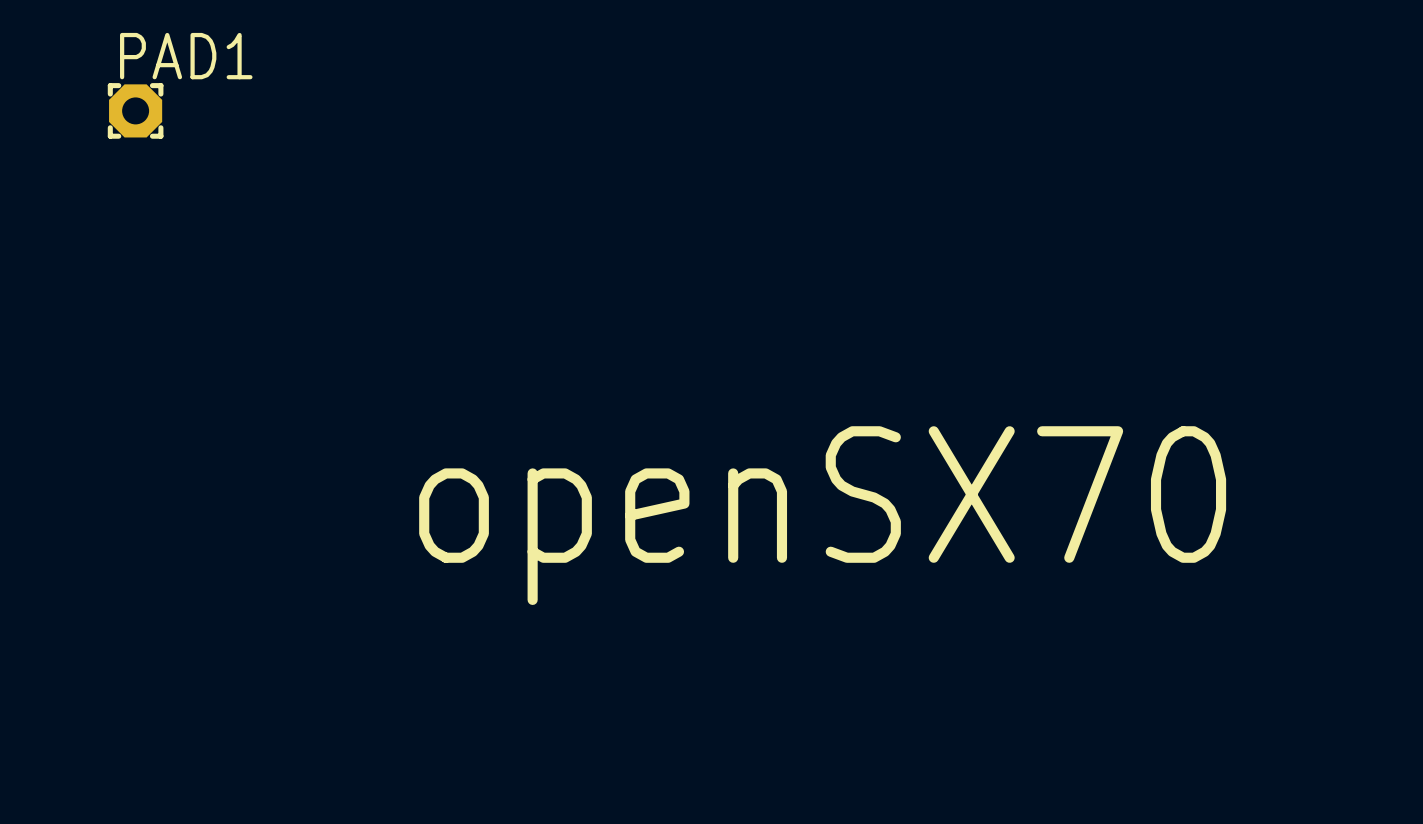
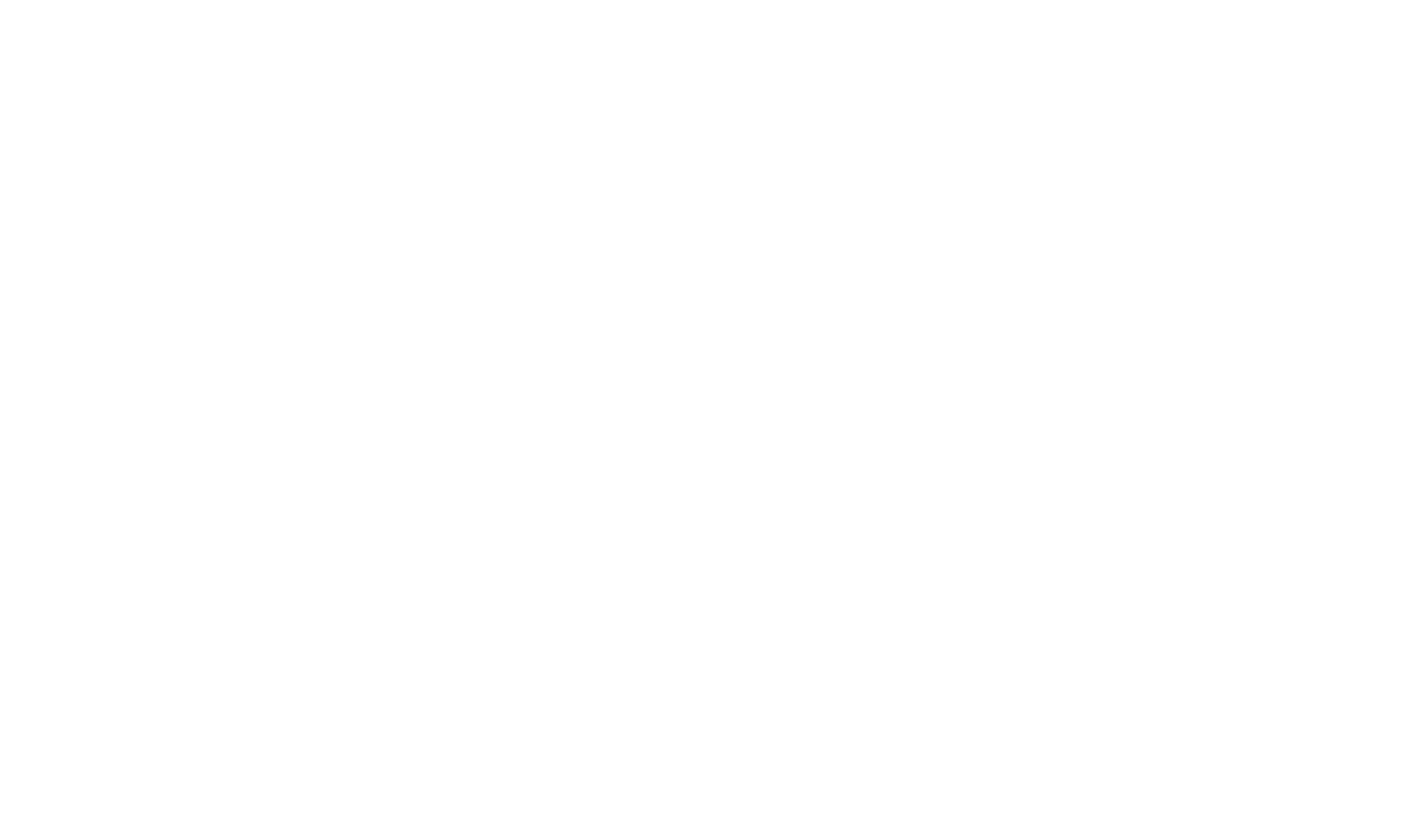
PAD1: (135, 110) -> none
text: openSX70 (822, 515) -> none

